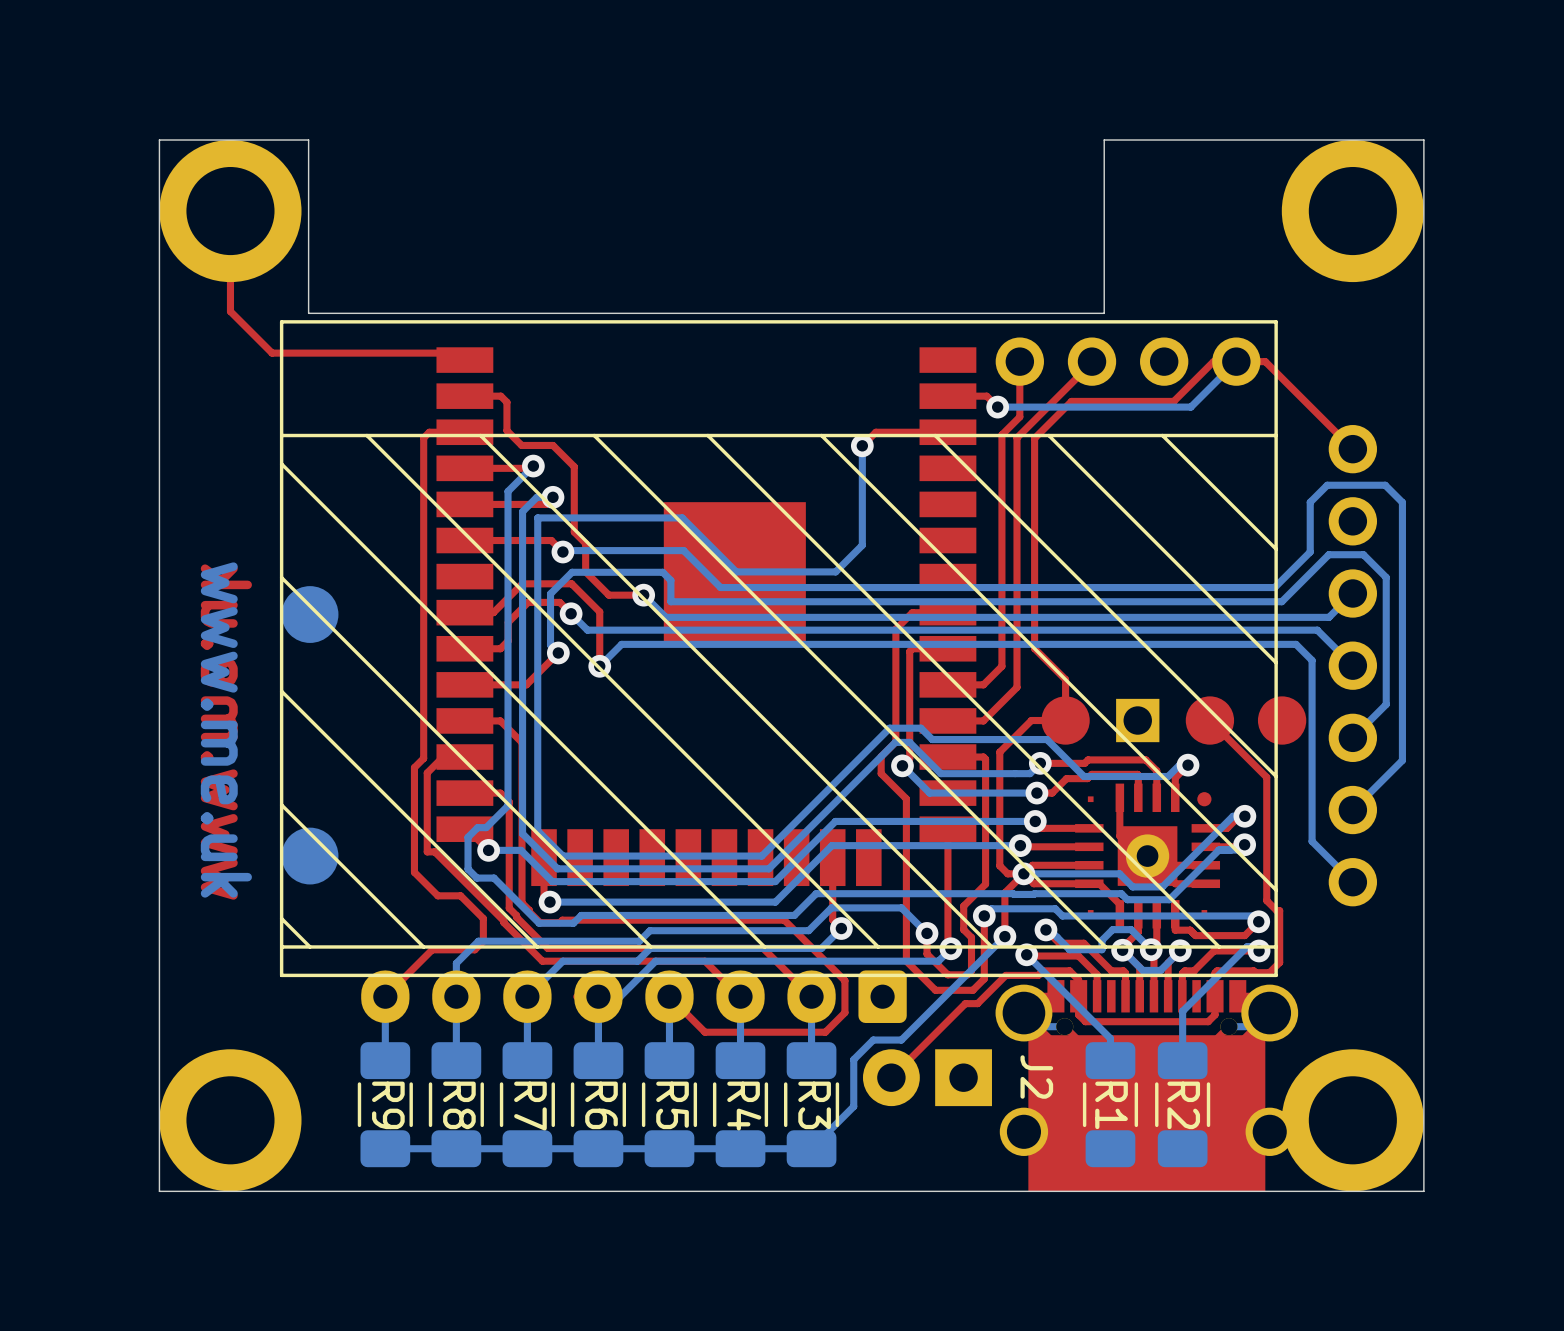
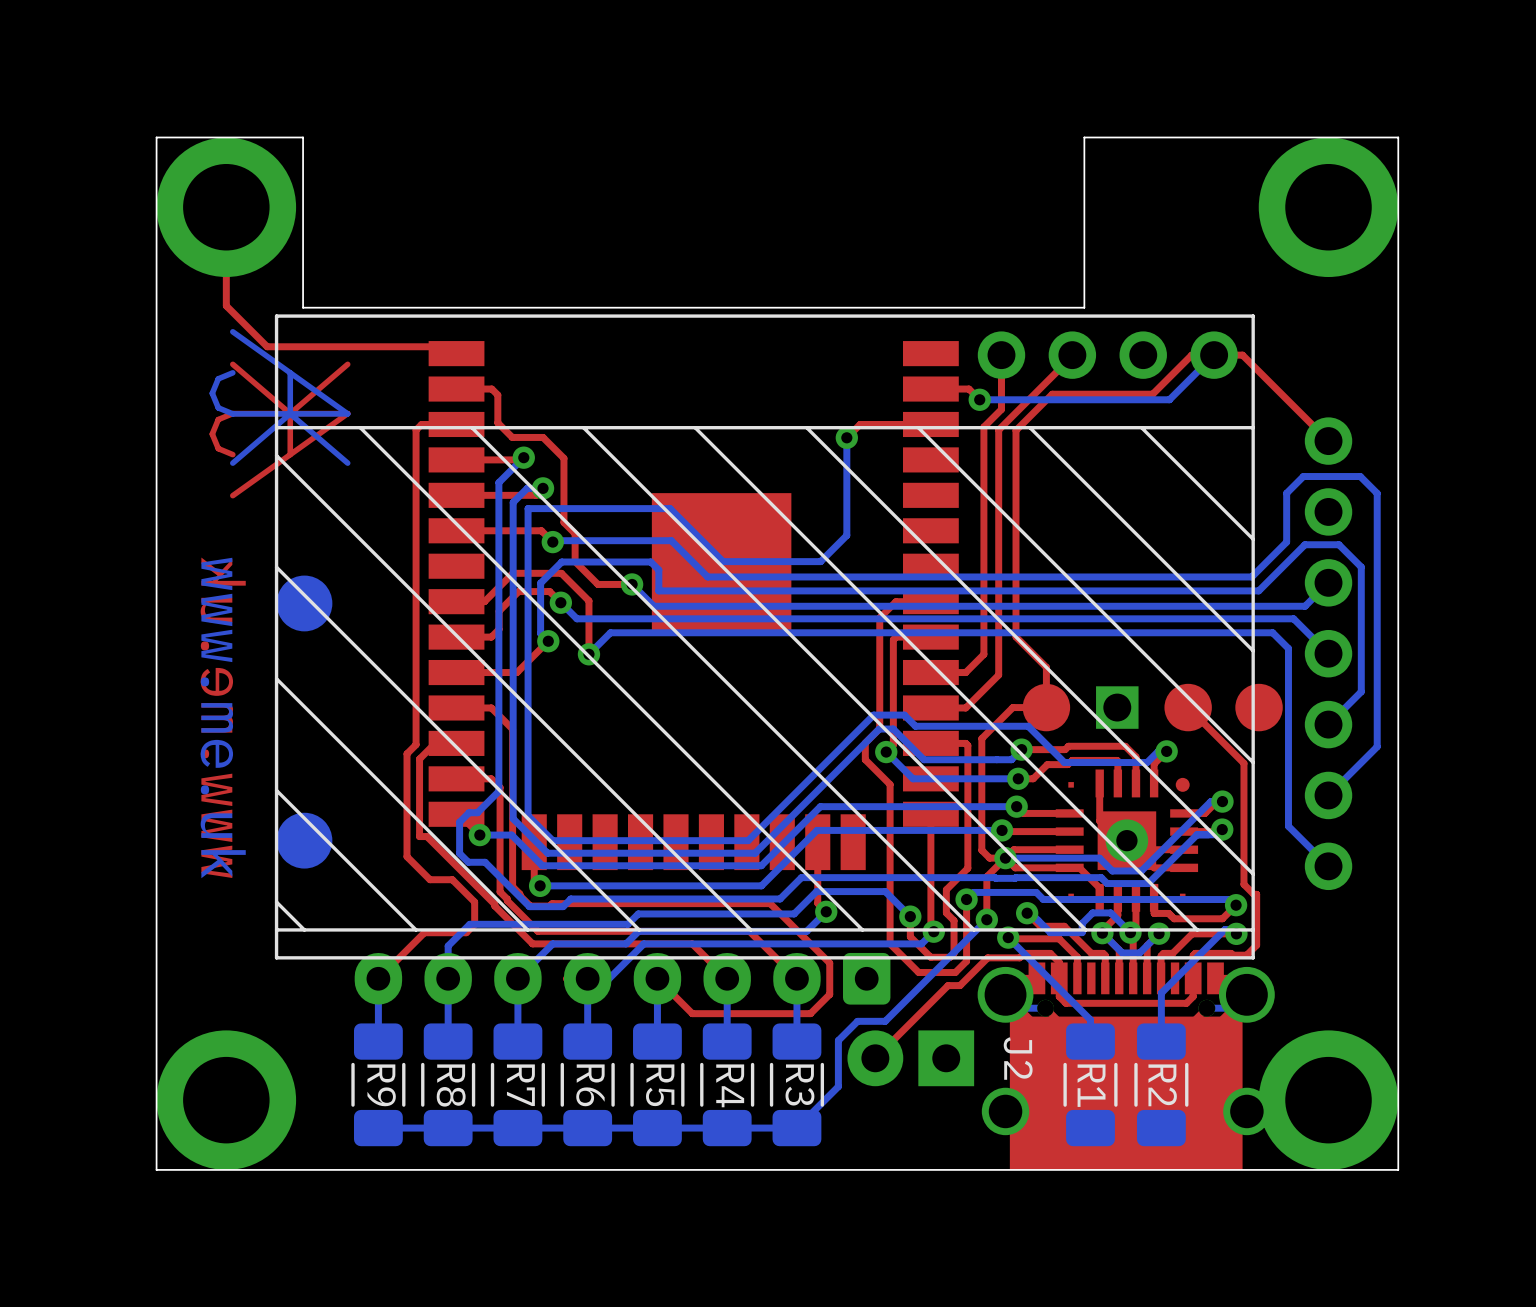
drawing: none -> [209, 329, 351, 499]

